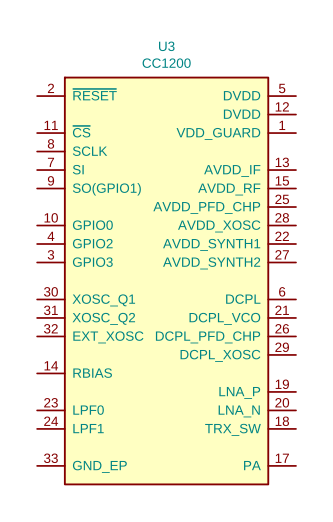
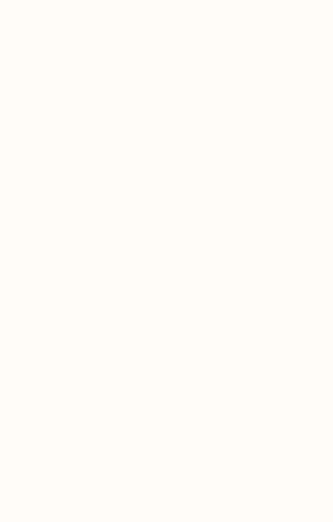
U3: CC1200 (166, 280) -> none

